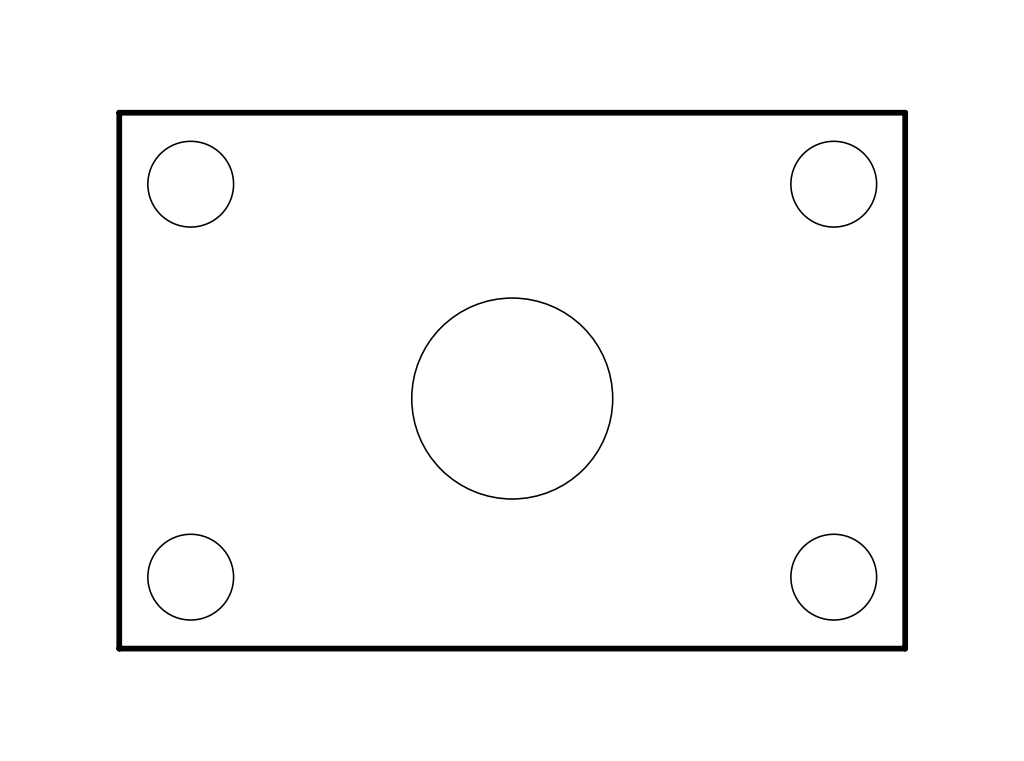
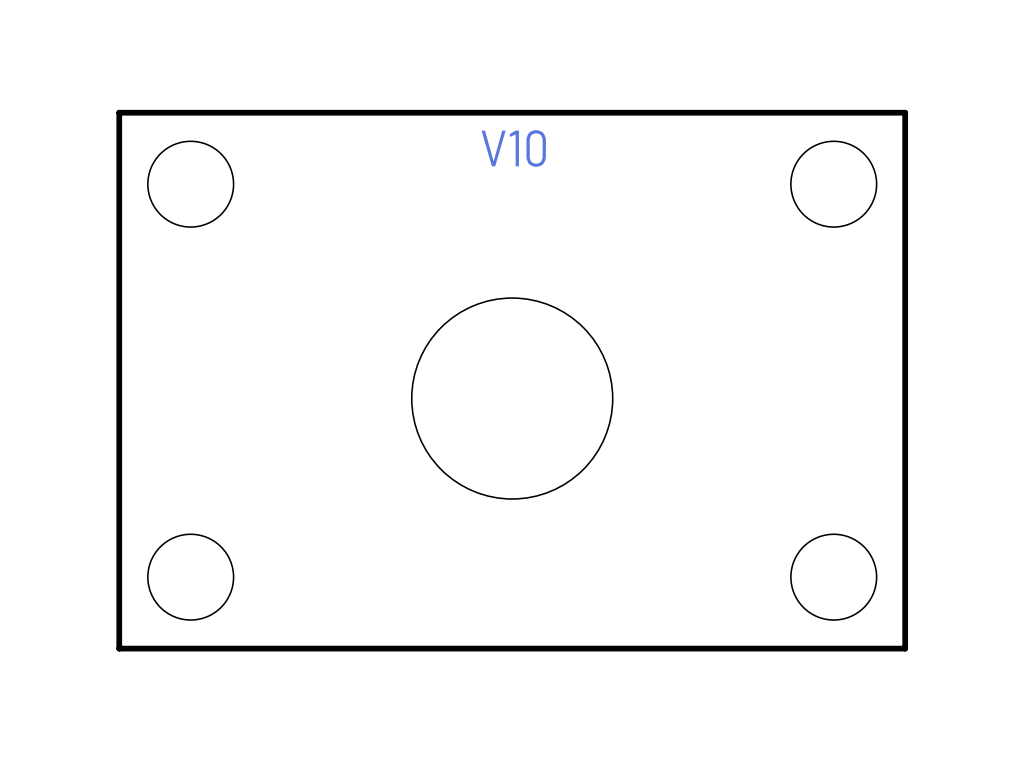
text: none -> V10 (513, 148)

